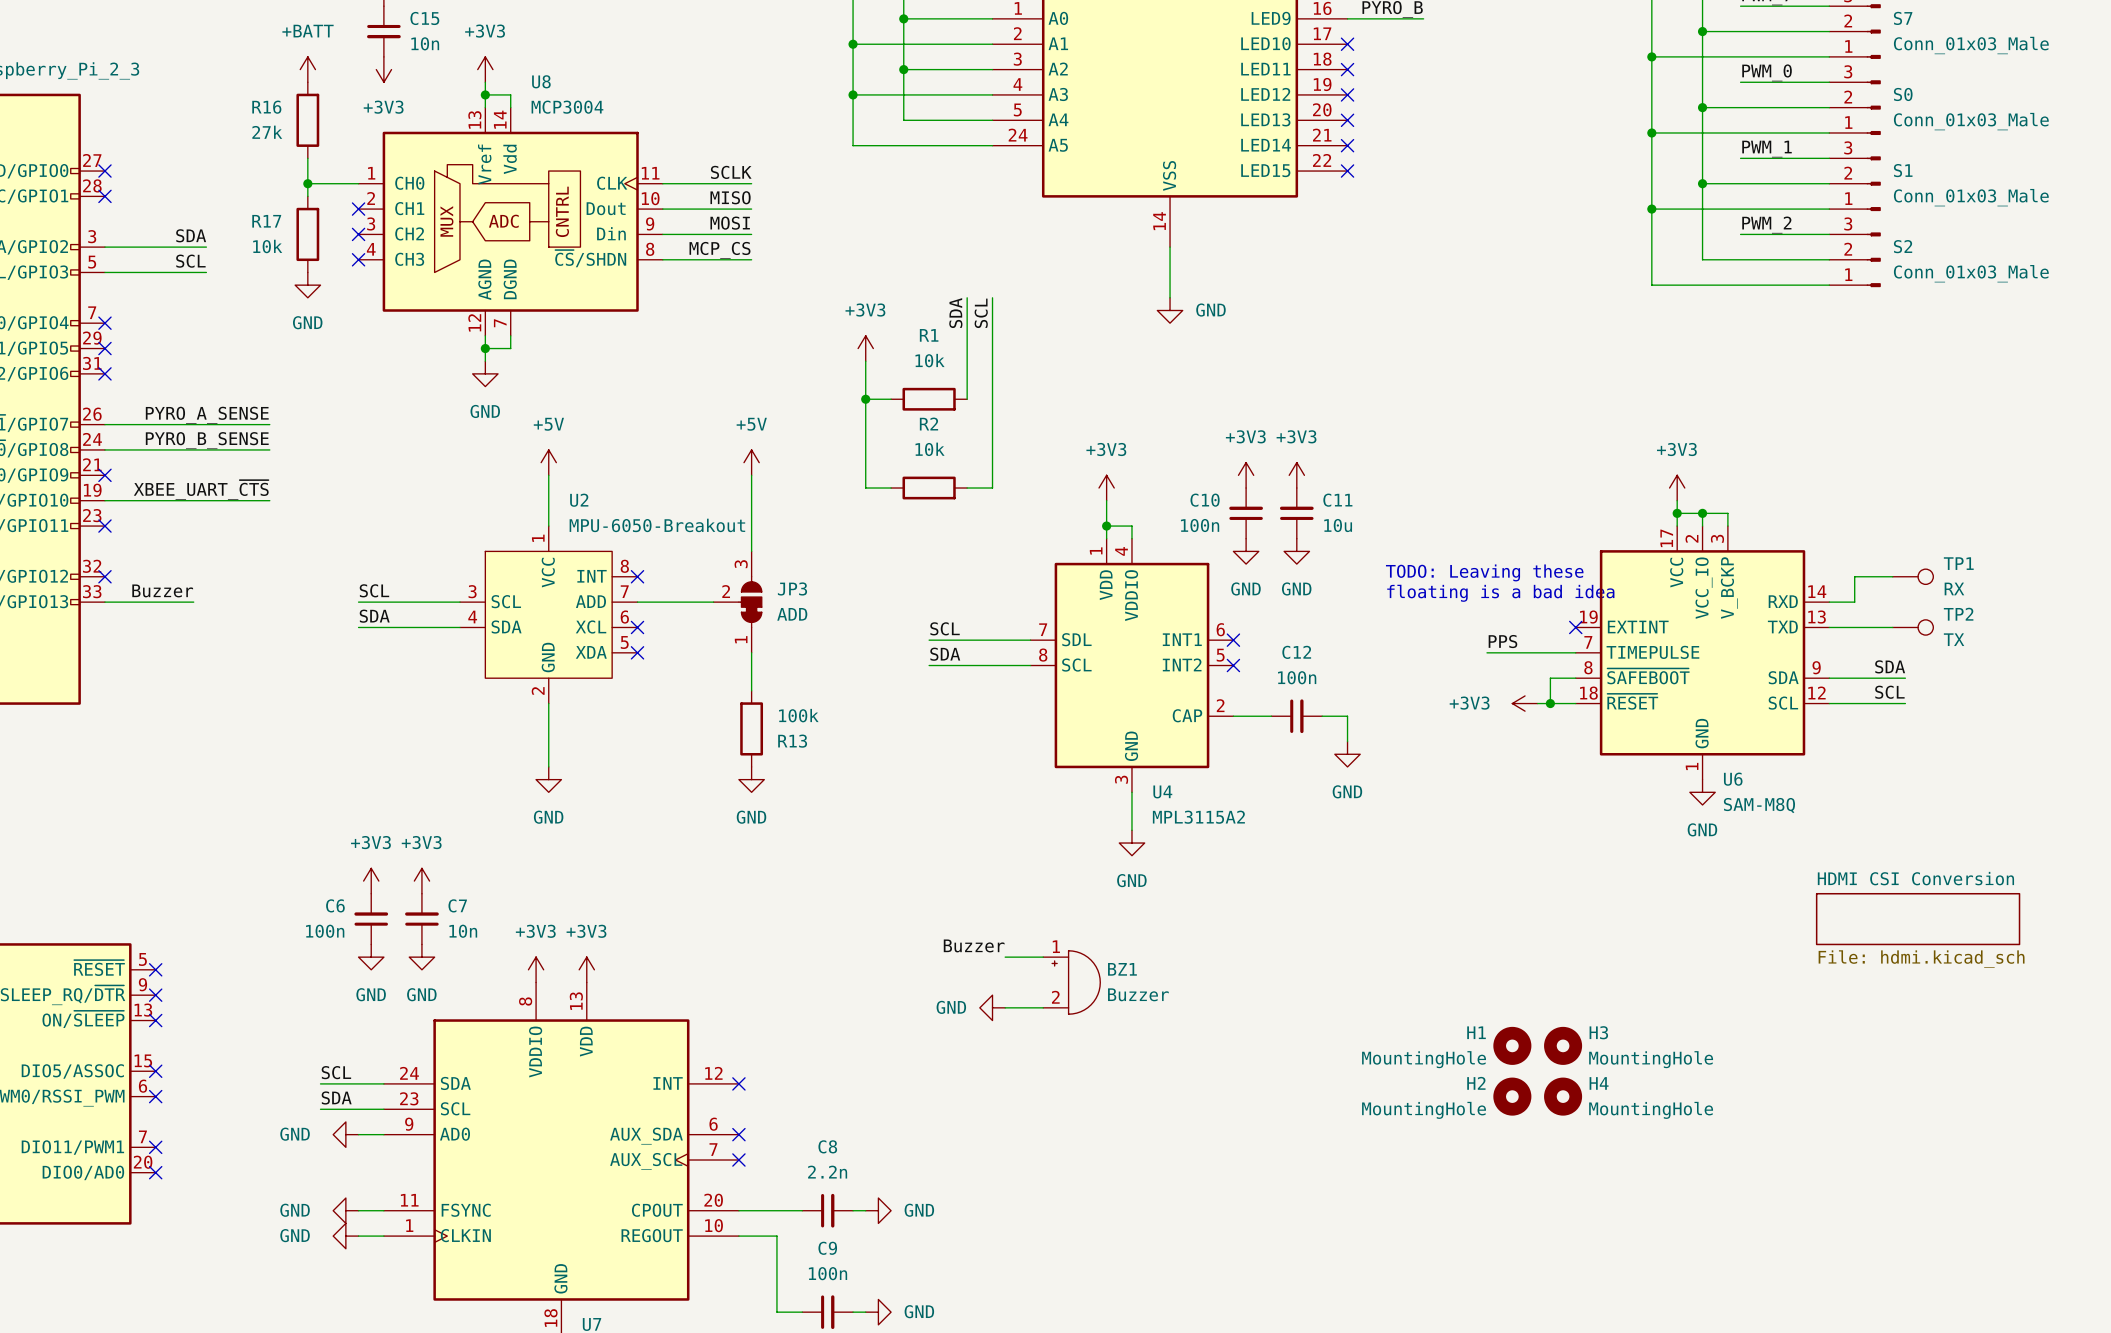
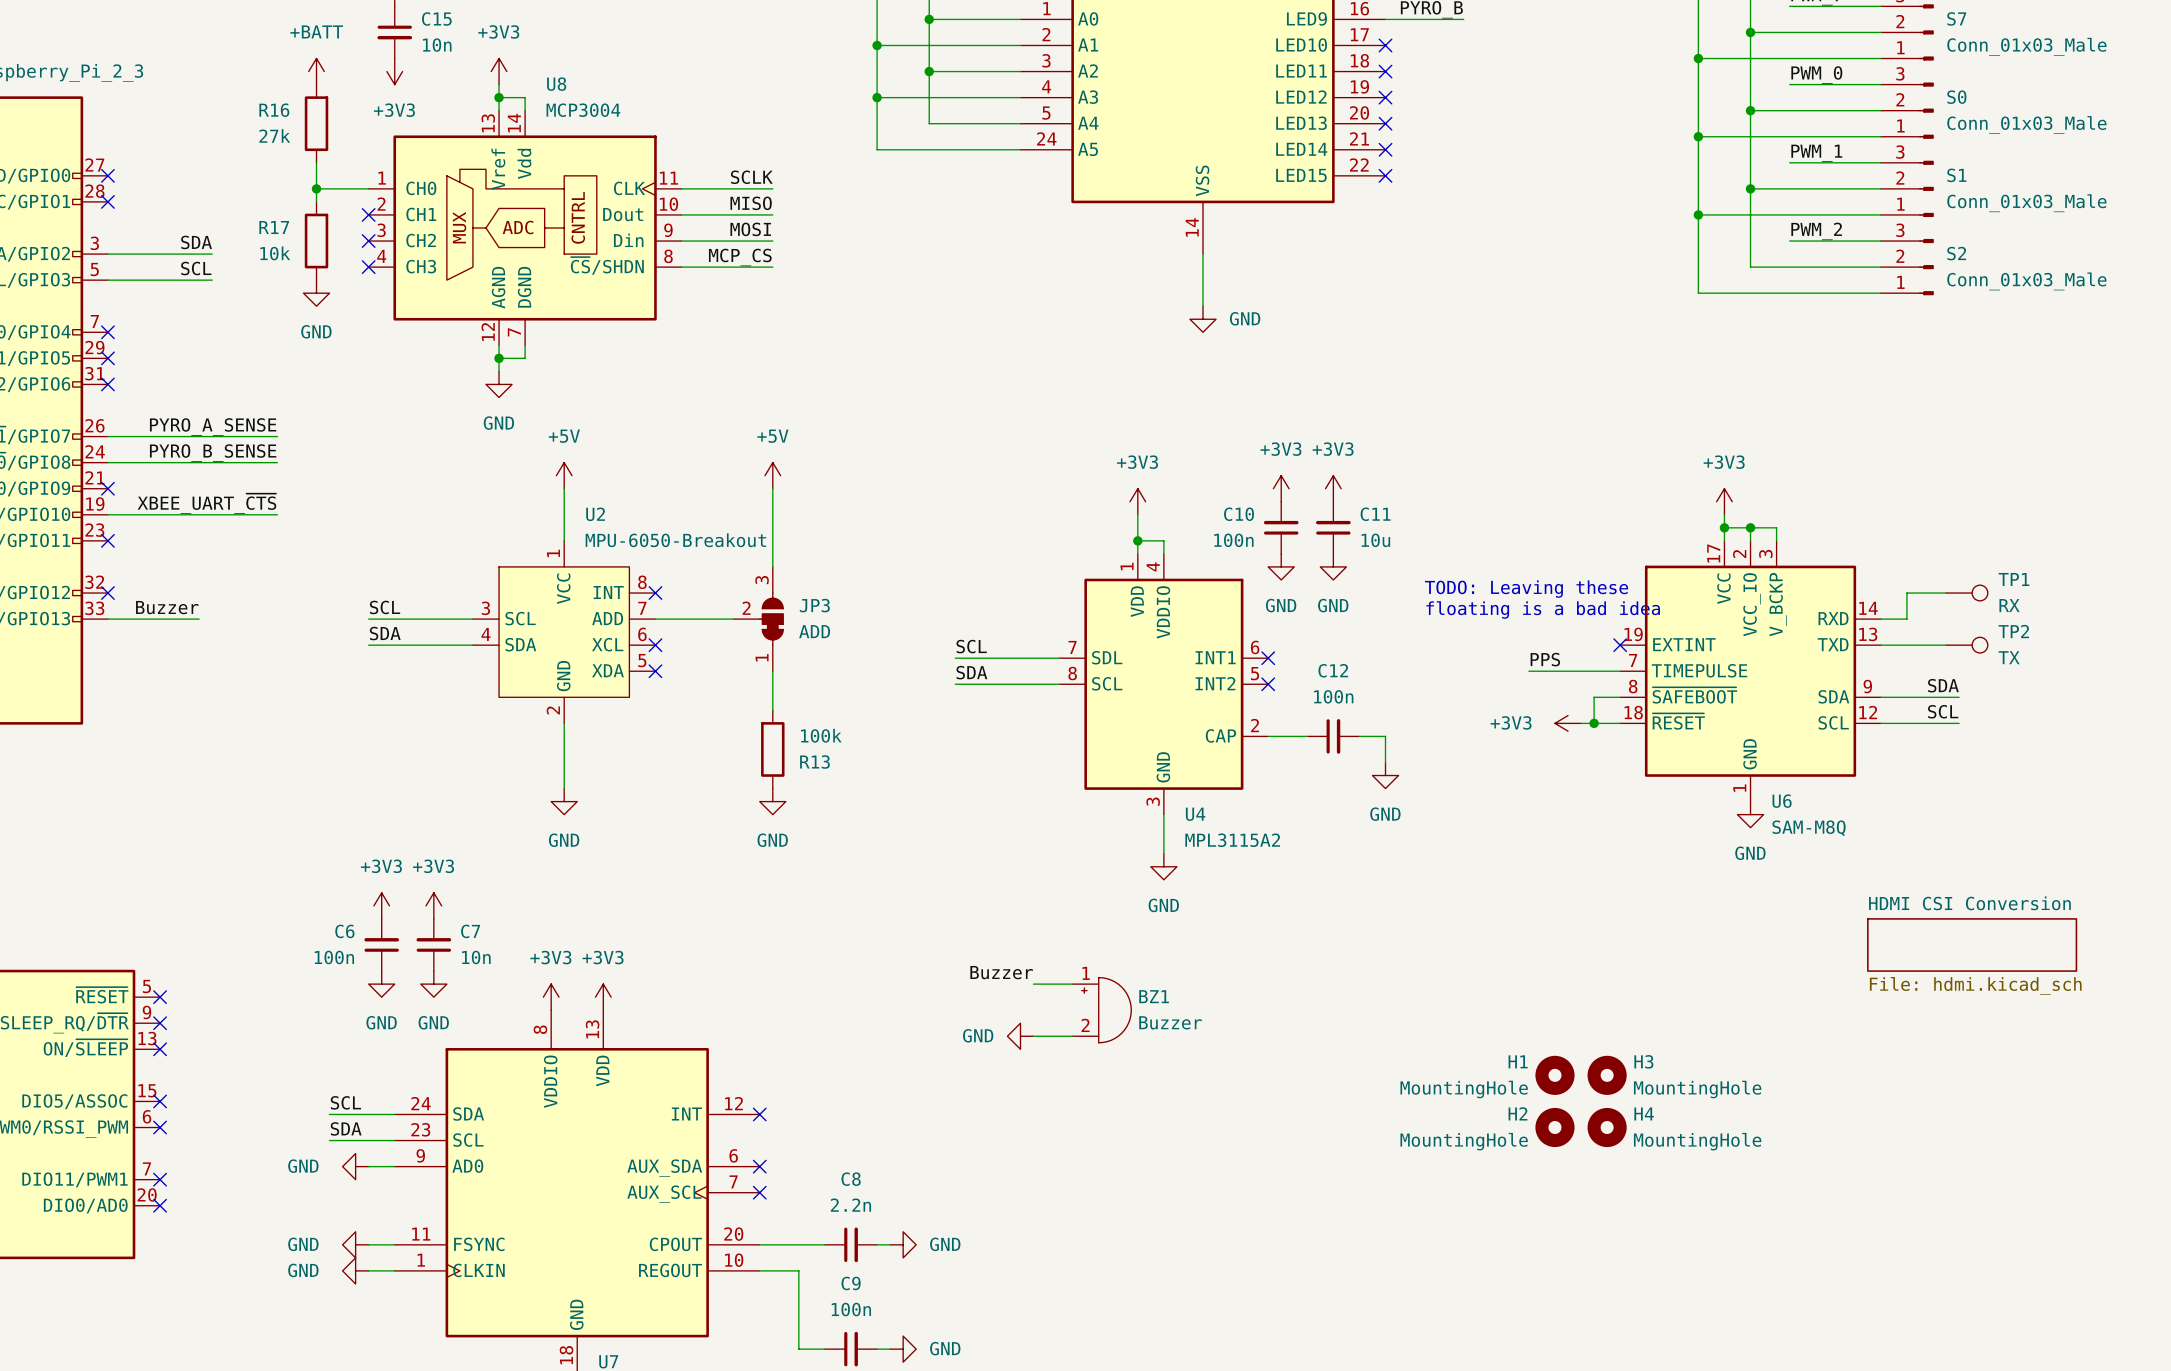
wire: (967, 297) (967, 399) -> none
wire: (992, 297) (992, 488) (967, 488) -> none
label: SDA (955, 313) -> none
label: SCL (981, 313) -> none
power symbol: +3V3 (865, 348) -> none
wire: (865, 361) (865, 488) (891, 488) -> none
wire: (865, 399) (891, 399) -> none
junction: (865, 399) -> none
R1: 10k (929, 399) -> none
R2: 10k (929, 488) -> none

